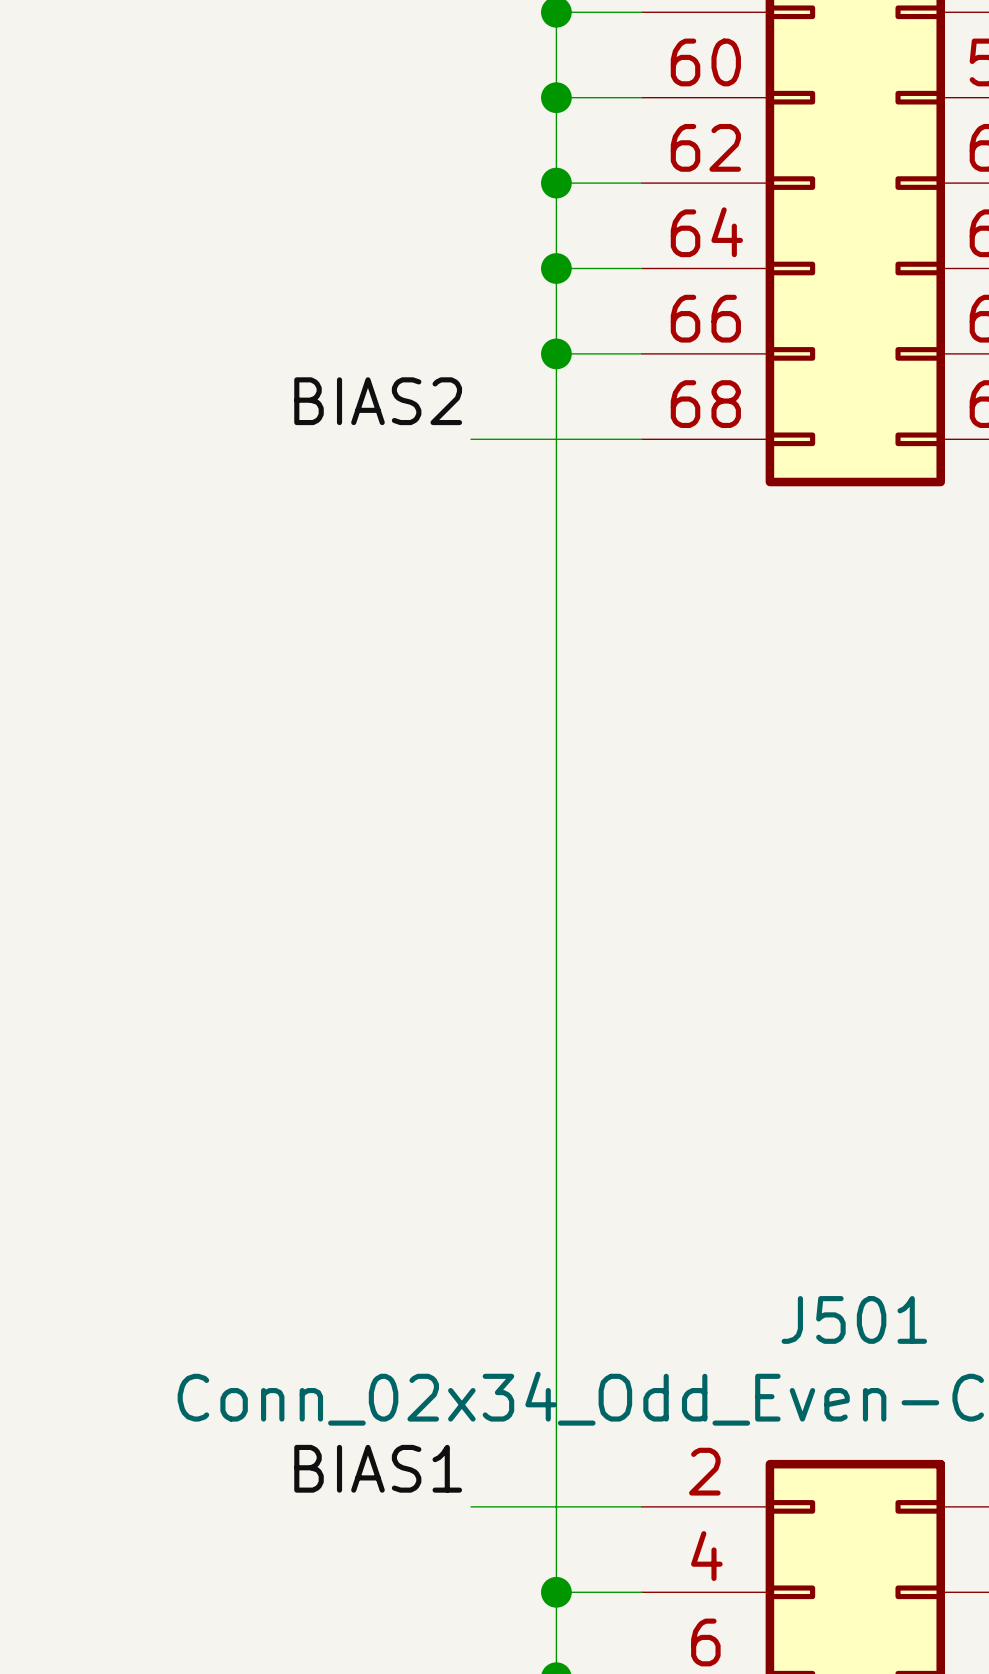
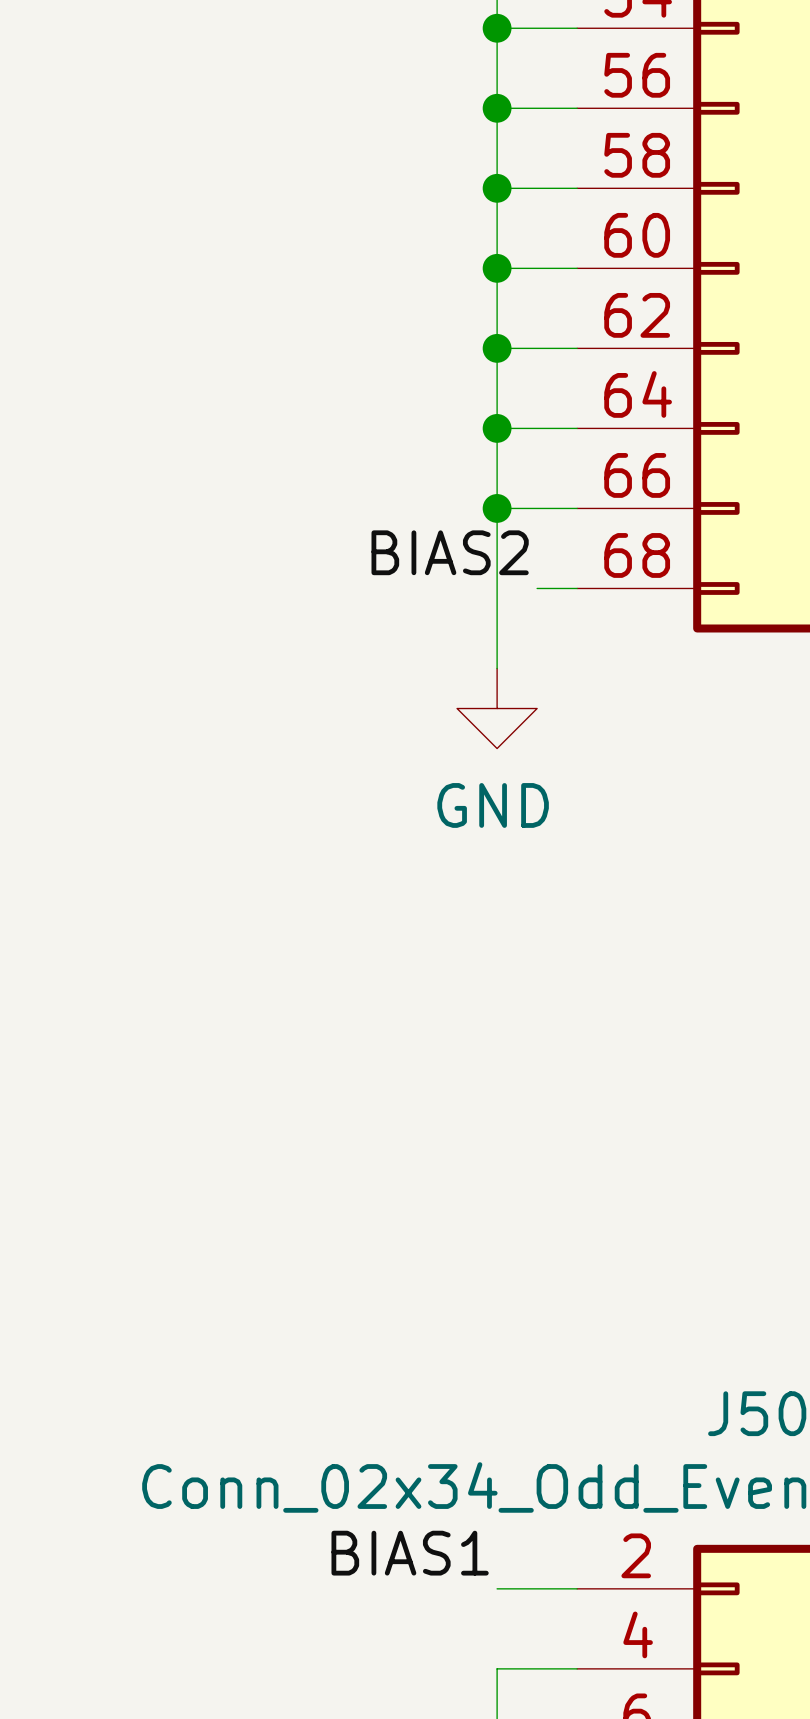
label position: BIAS2 (378, 401) -> BIAS2 (450, 552)
wire: (470, 439) (599, 439) -> none
wire: (556, 524) (556, 1592) -> none
power symbol: none -> GND (497, 708)
label position: BIAS1 (378, 1468) -> BIAS1 (410, 1553)
wire: (470, 1506) (556, 1506) -> none
junction: (556, 1592) -> none

